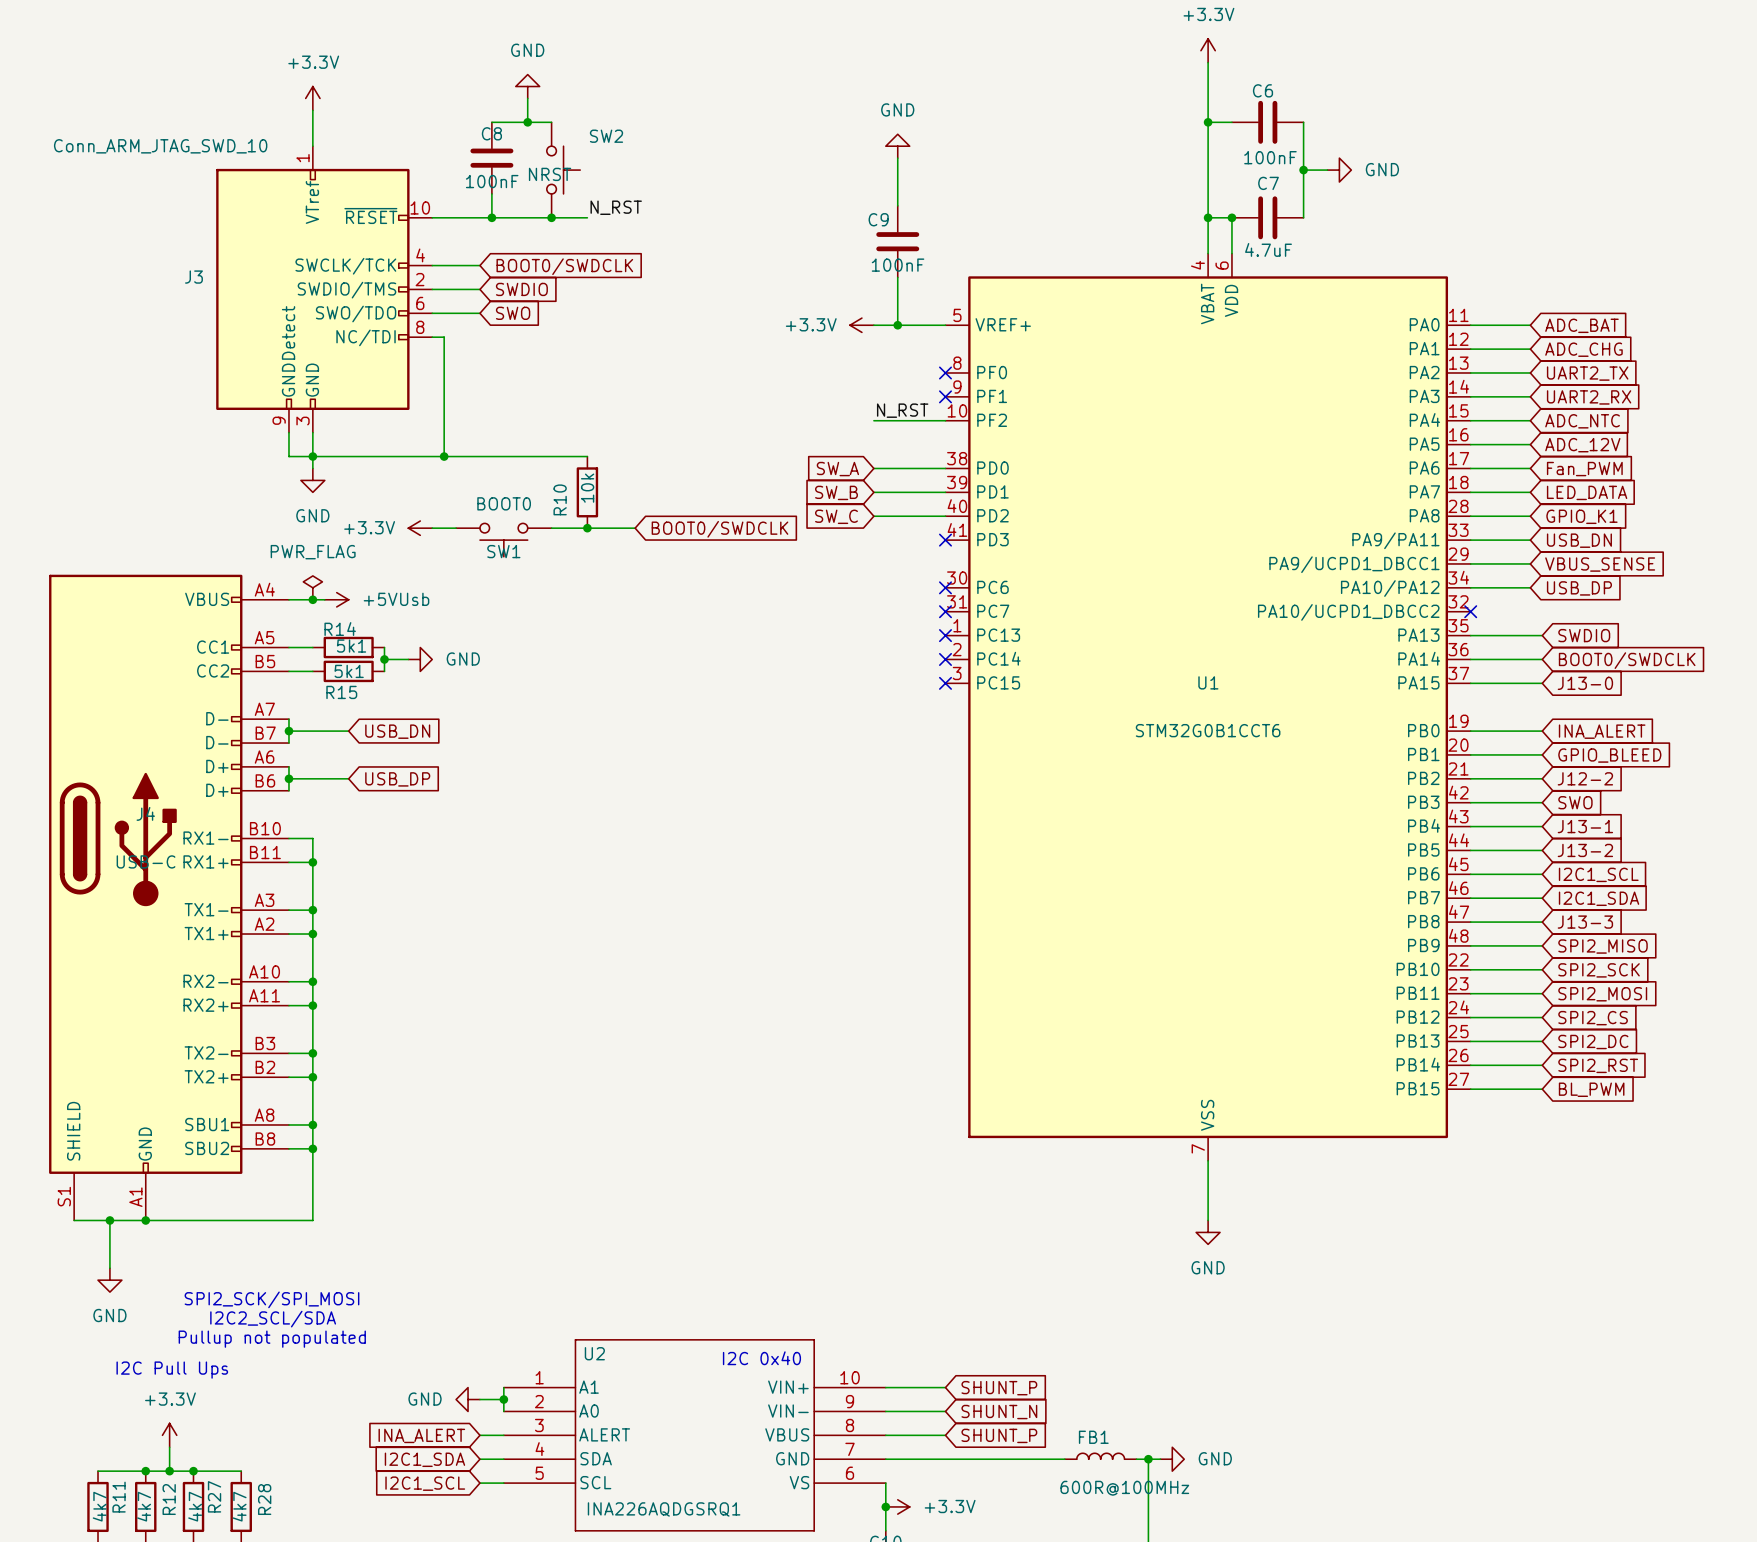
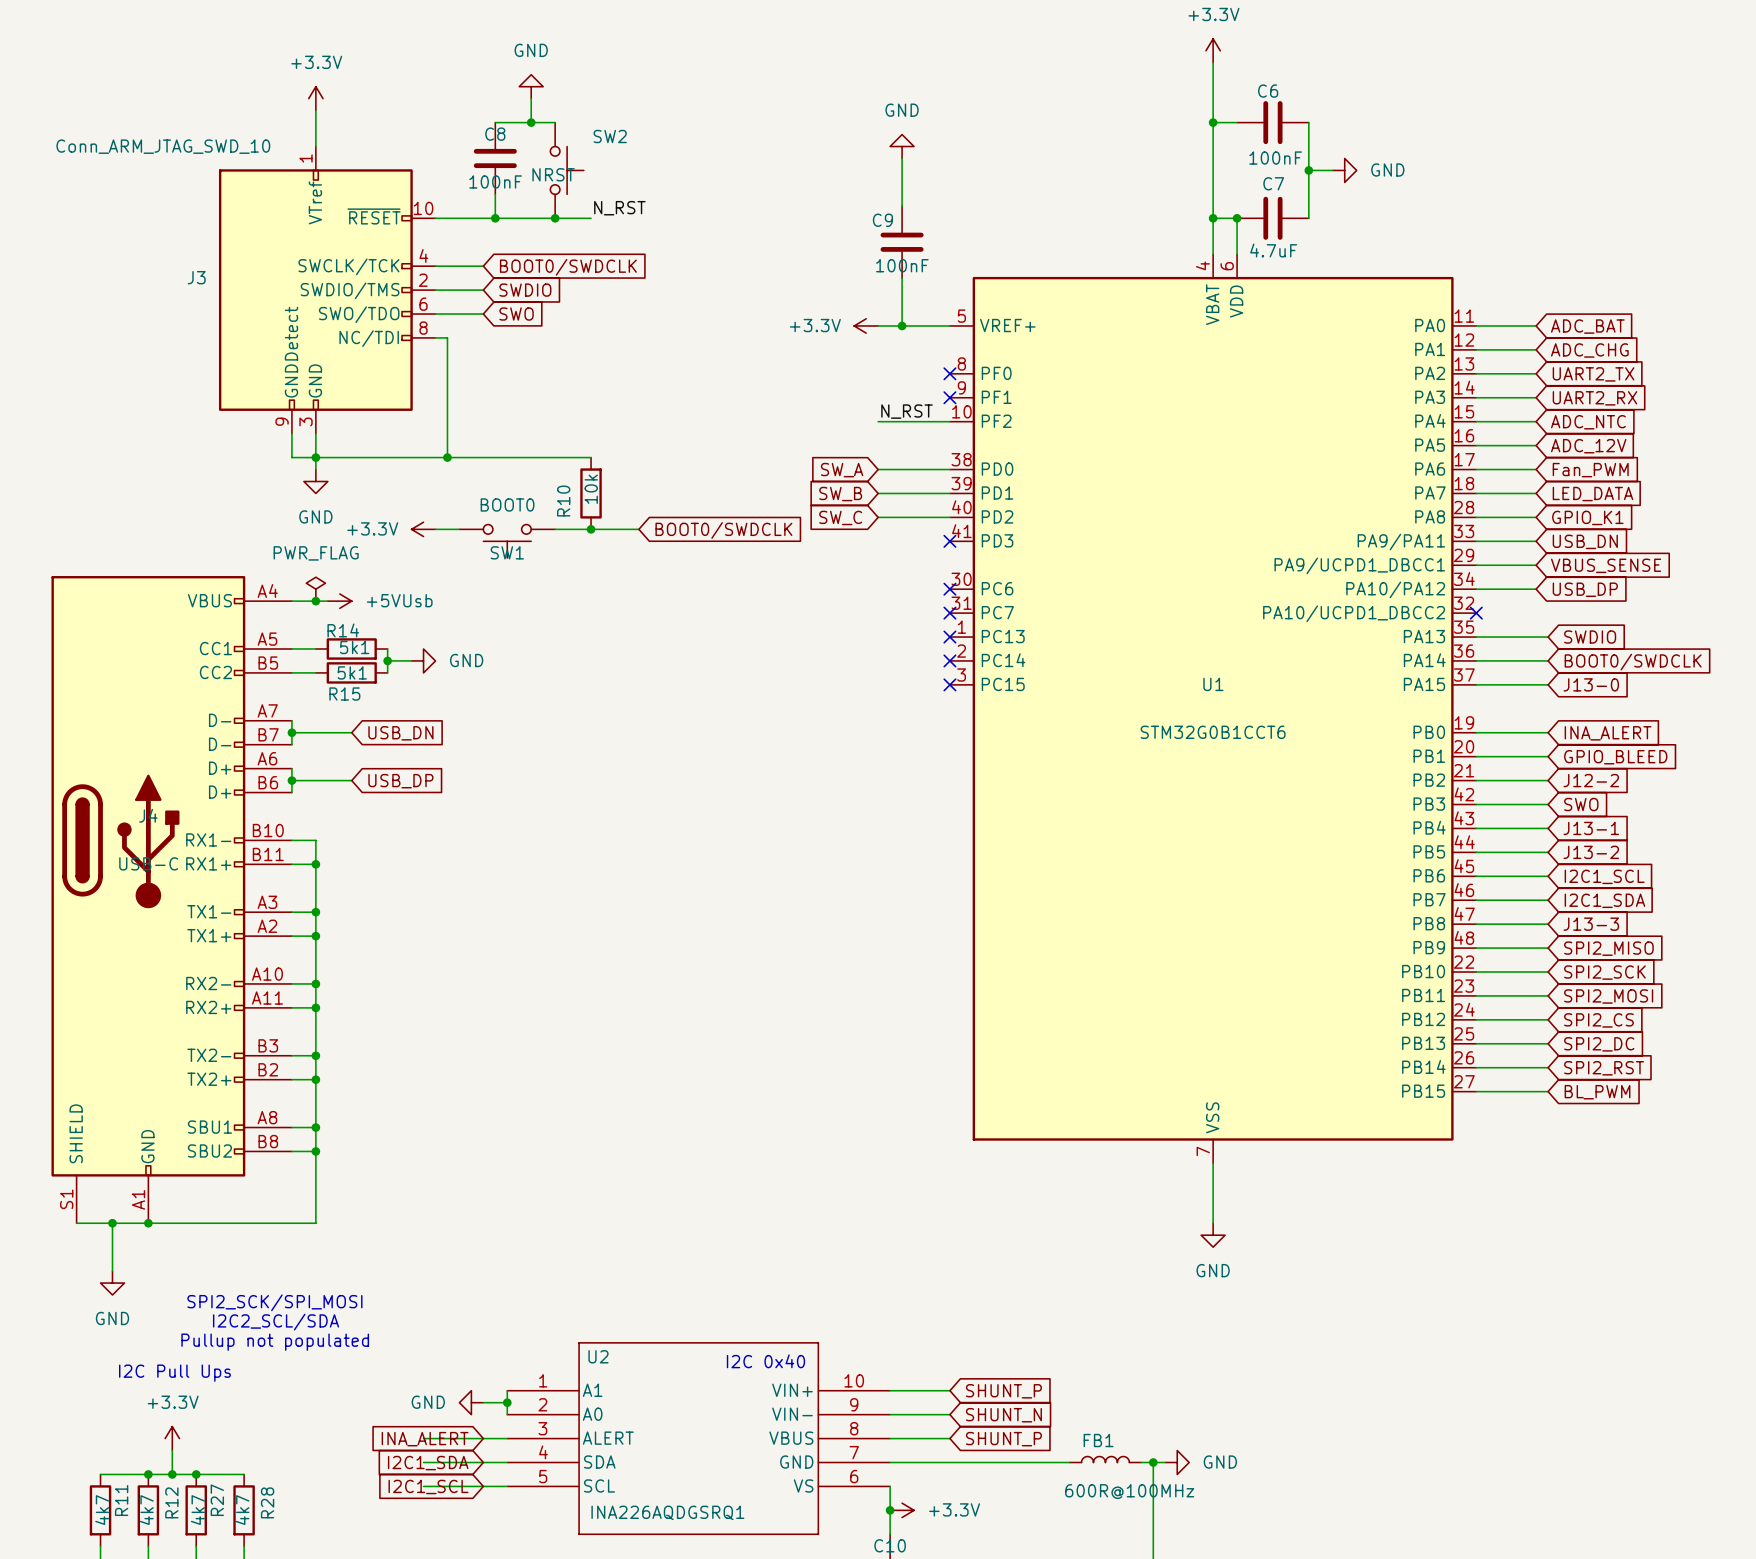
wire: none -> (423, 1438) (483, 1438)
wire: none -> (423, 1462) (483, 1462)
wire: none -> (423, 1486) (483, 1486)

